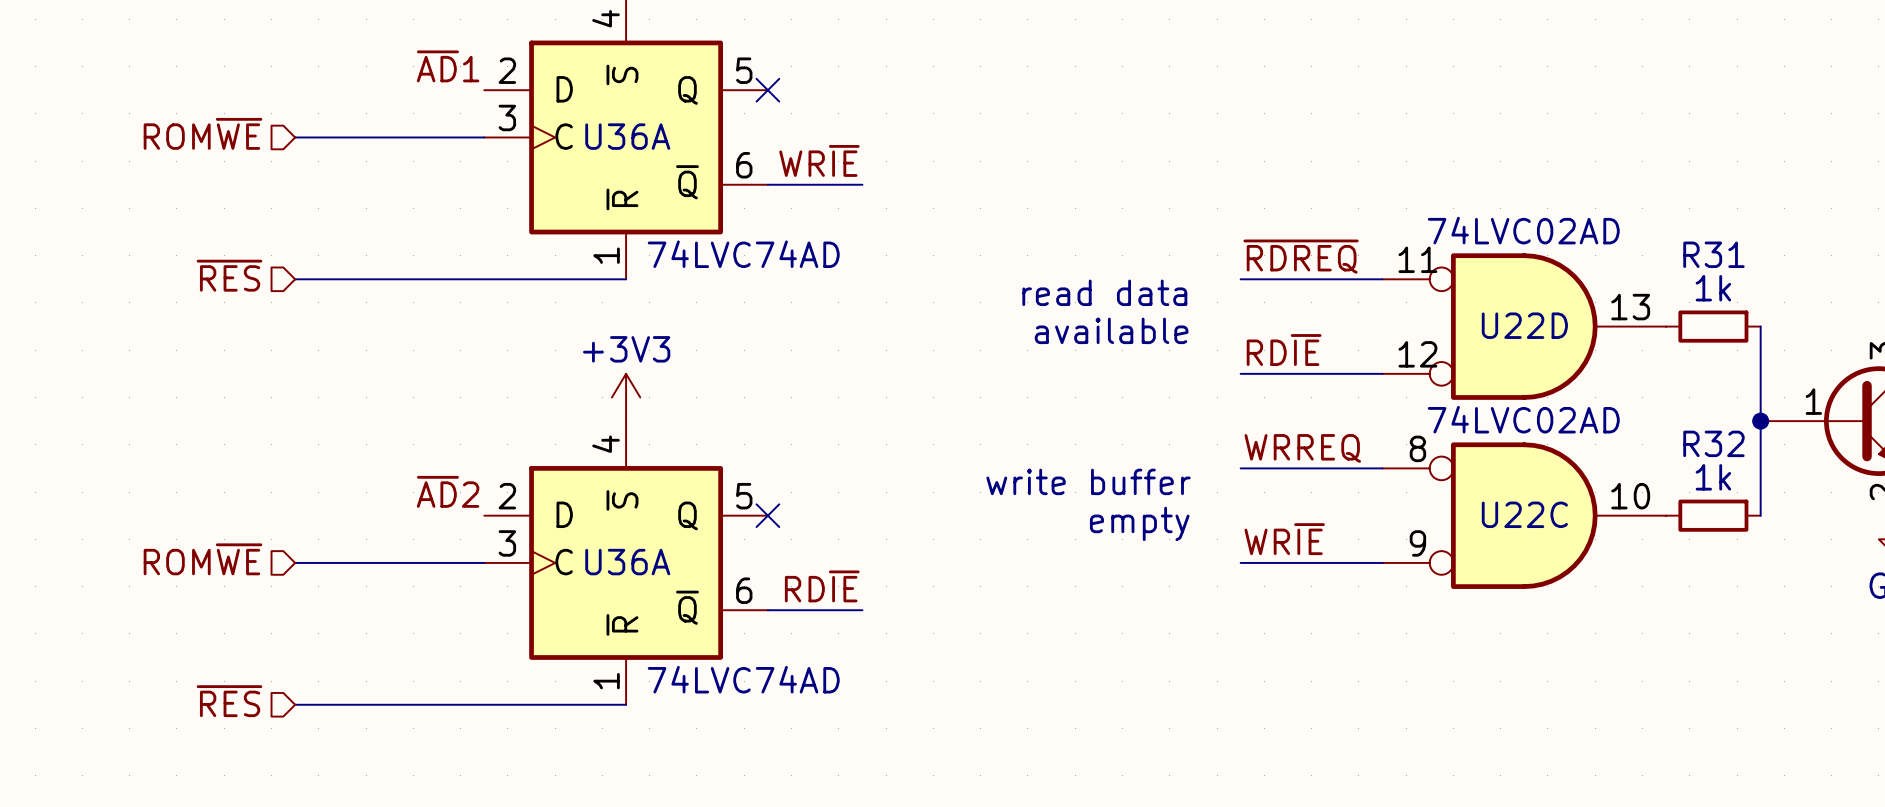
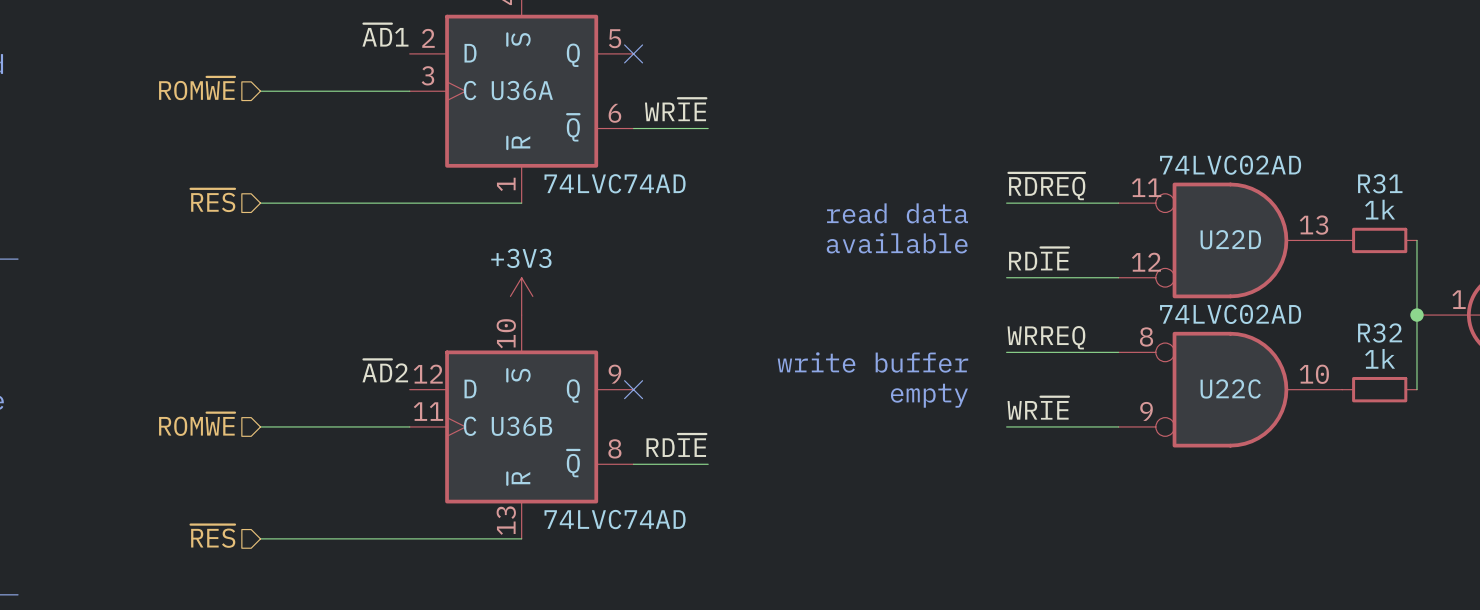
U36A pin number: 4 (606, 444) -> 10 (506, 333)
U36A pin number: 2 (507, 496) -> 12 (428, 374)
U36A pin number: 5 (744, 496) -> 9 (614, 374)
U36A pin number: 3 (507, 543) -> 11 (428, 411)
U36A name: U36A (627, 562) -> U36B (521, 426)
U36A pin number: 6 (744, 590) -> 8 (614, 448)
U36A pin number: 1 (606, 681) -> 13 (506, 520)

